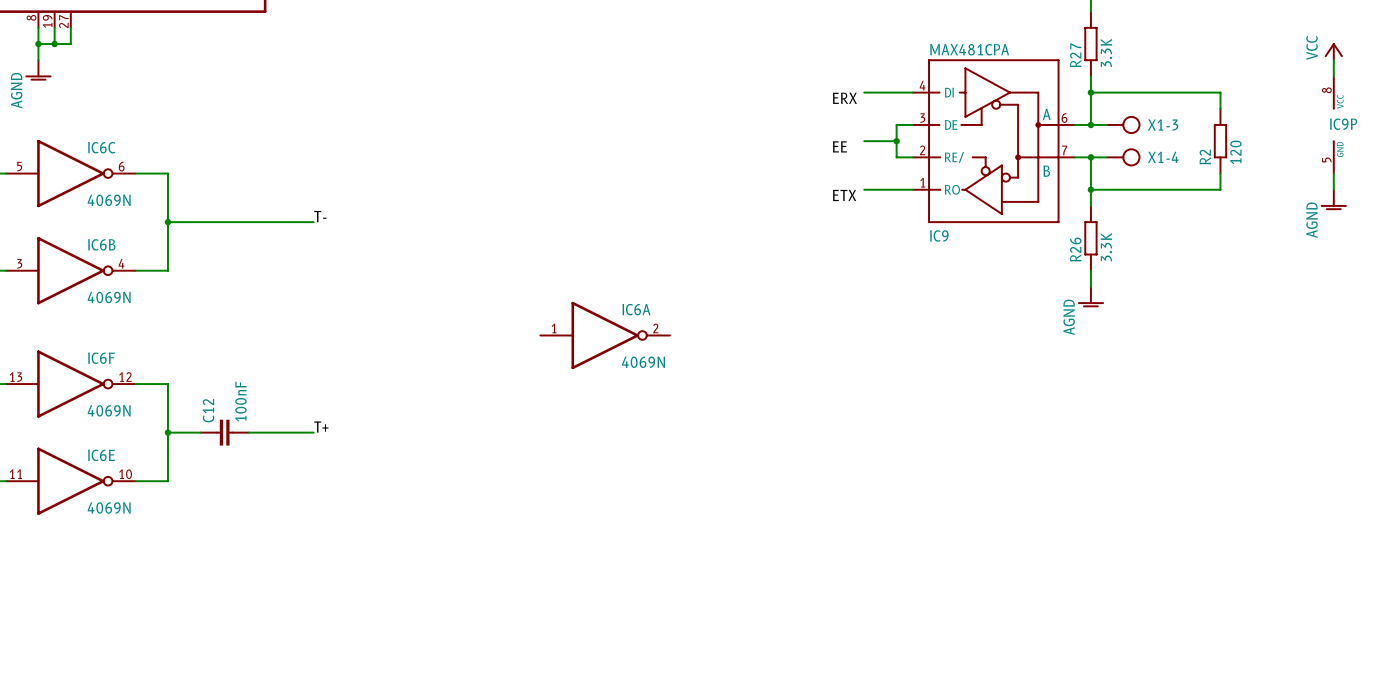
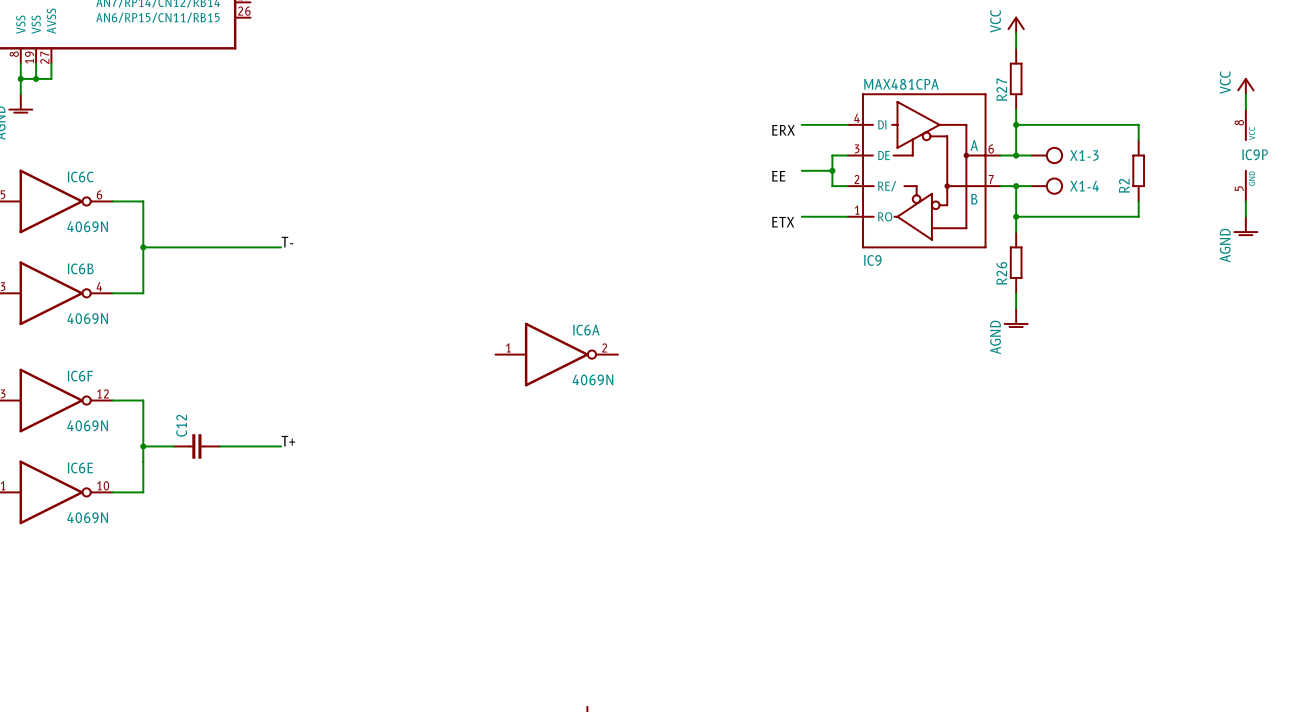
R27 value: 3.3K (1106, 52) -> none
R2 value: 120 (1235, 152) -> none
R26 value: 3.3K (1106, 247) -> none
C12 value: 100nF (240, 401) -> none

